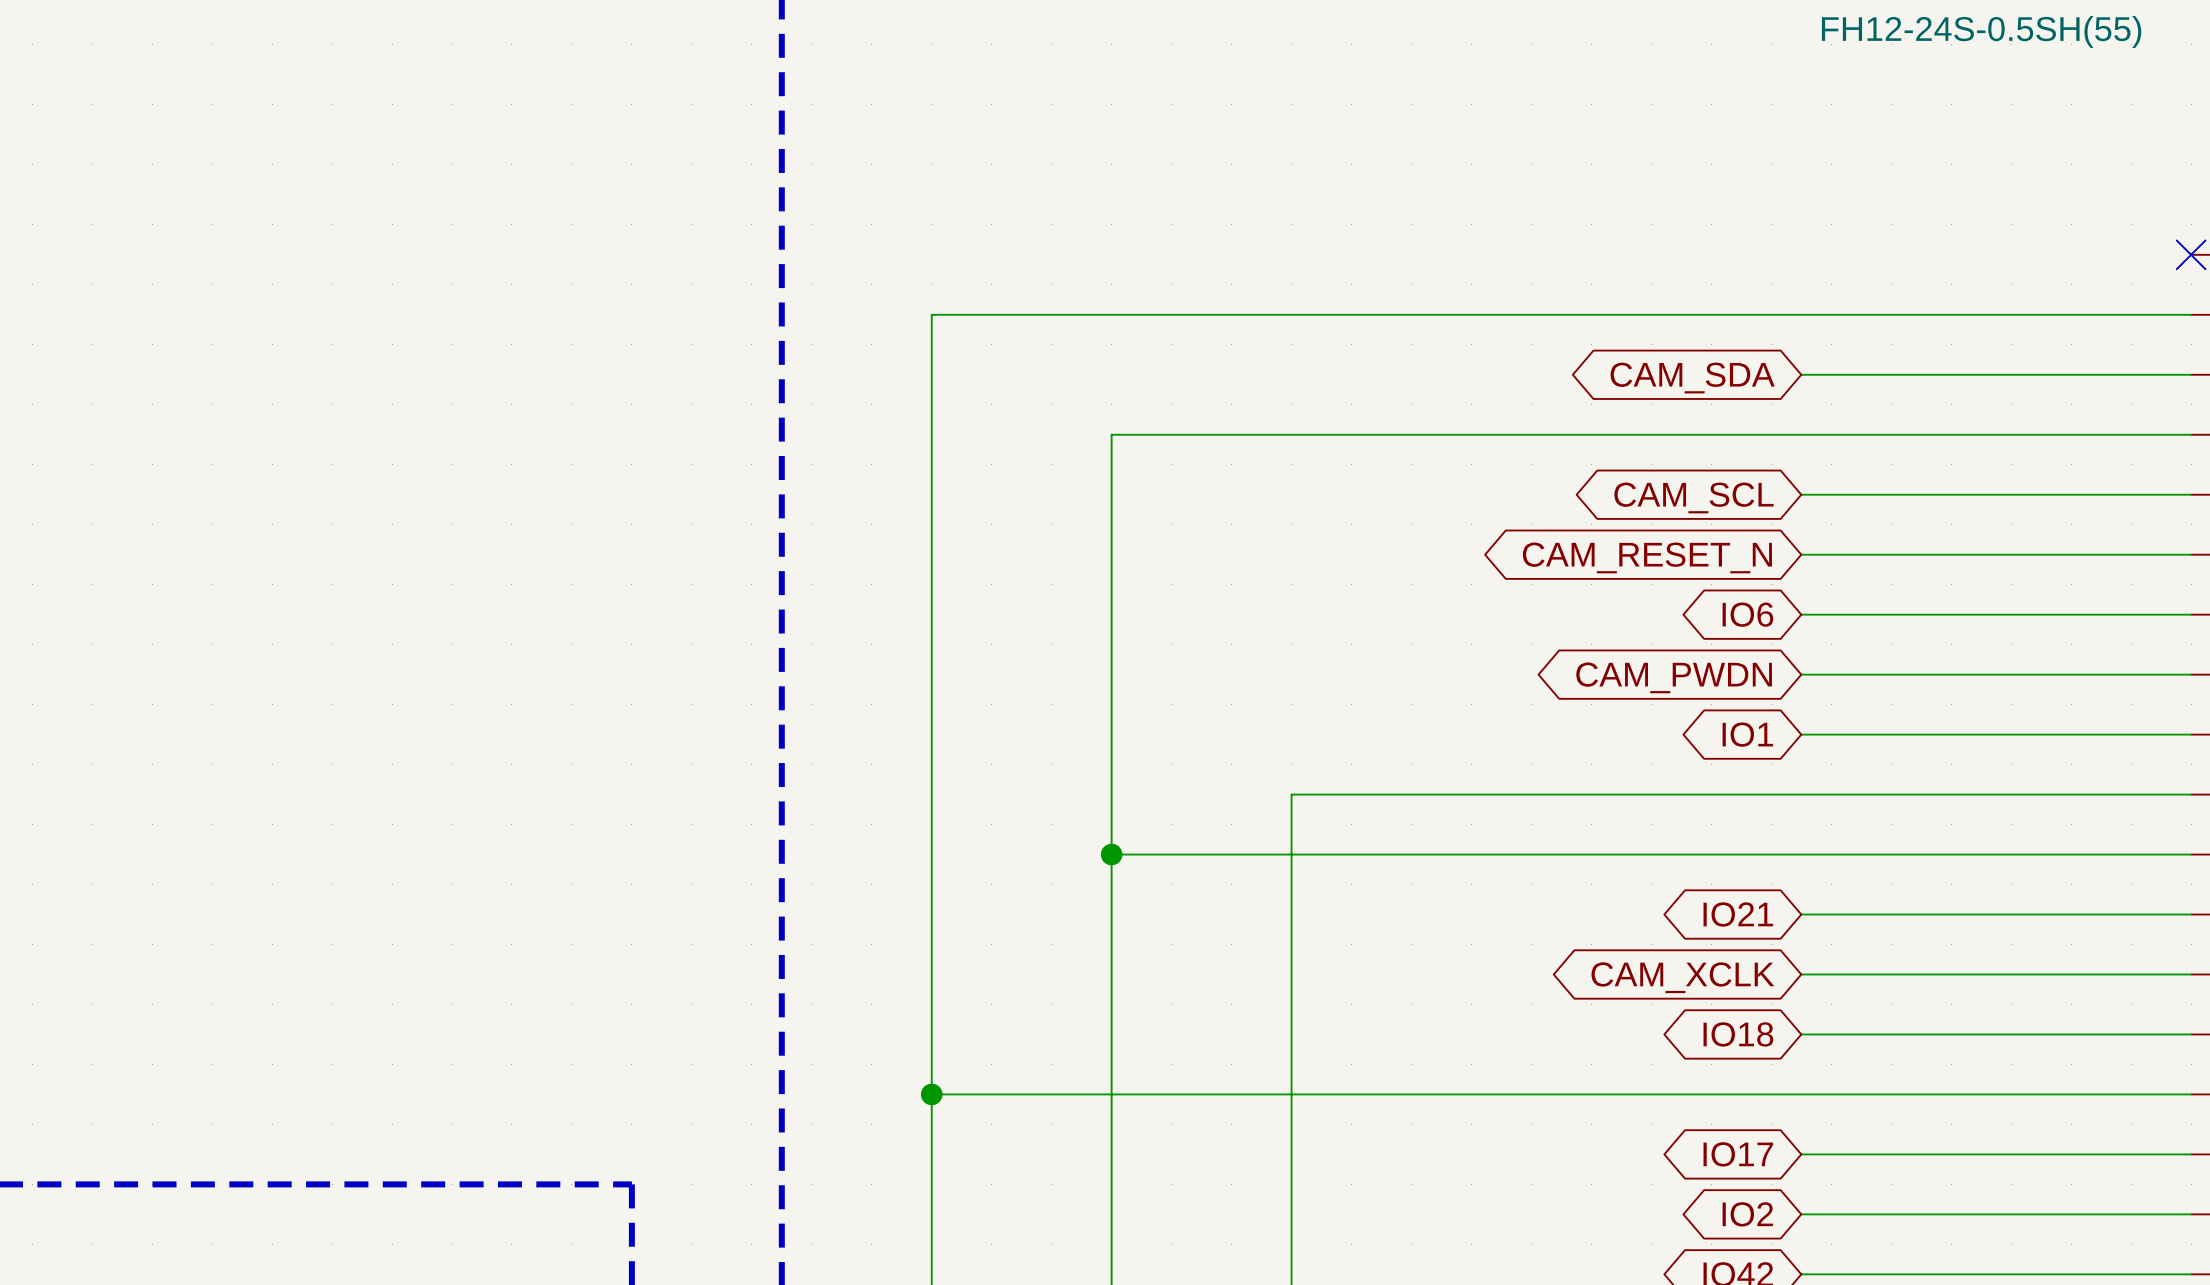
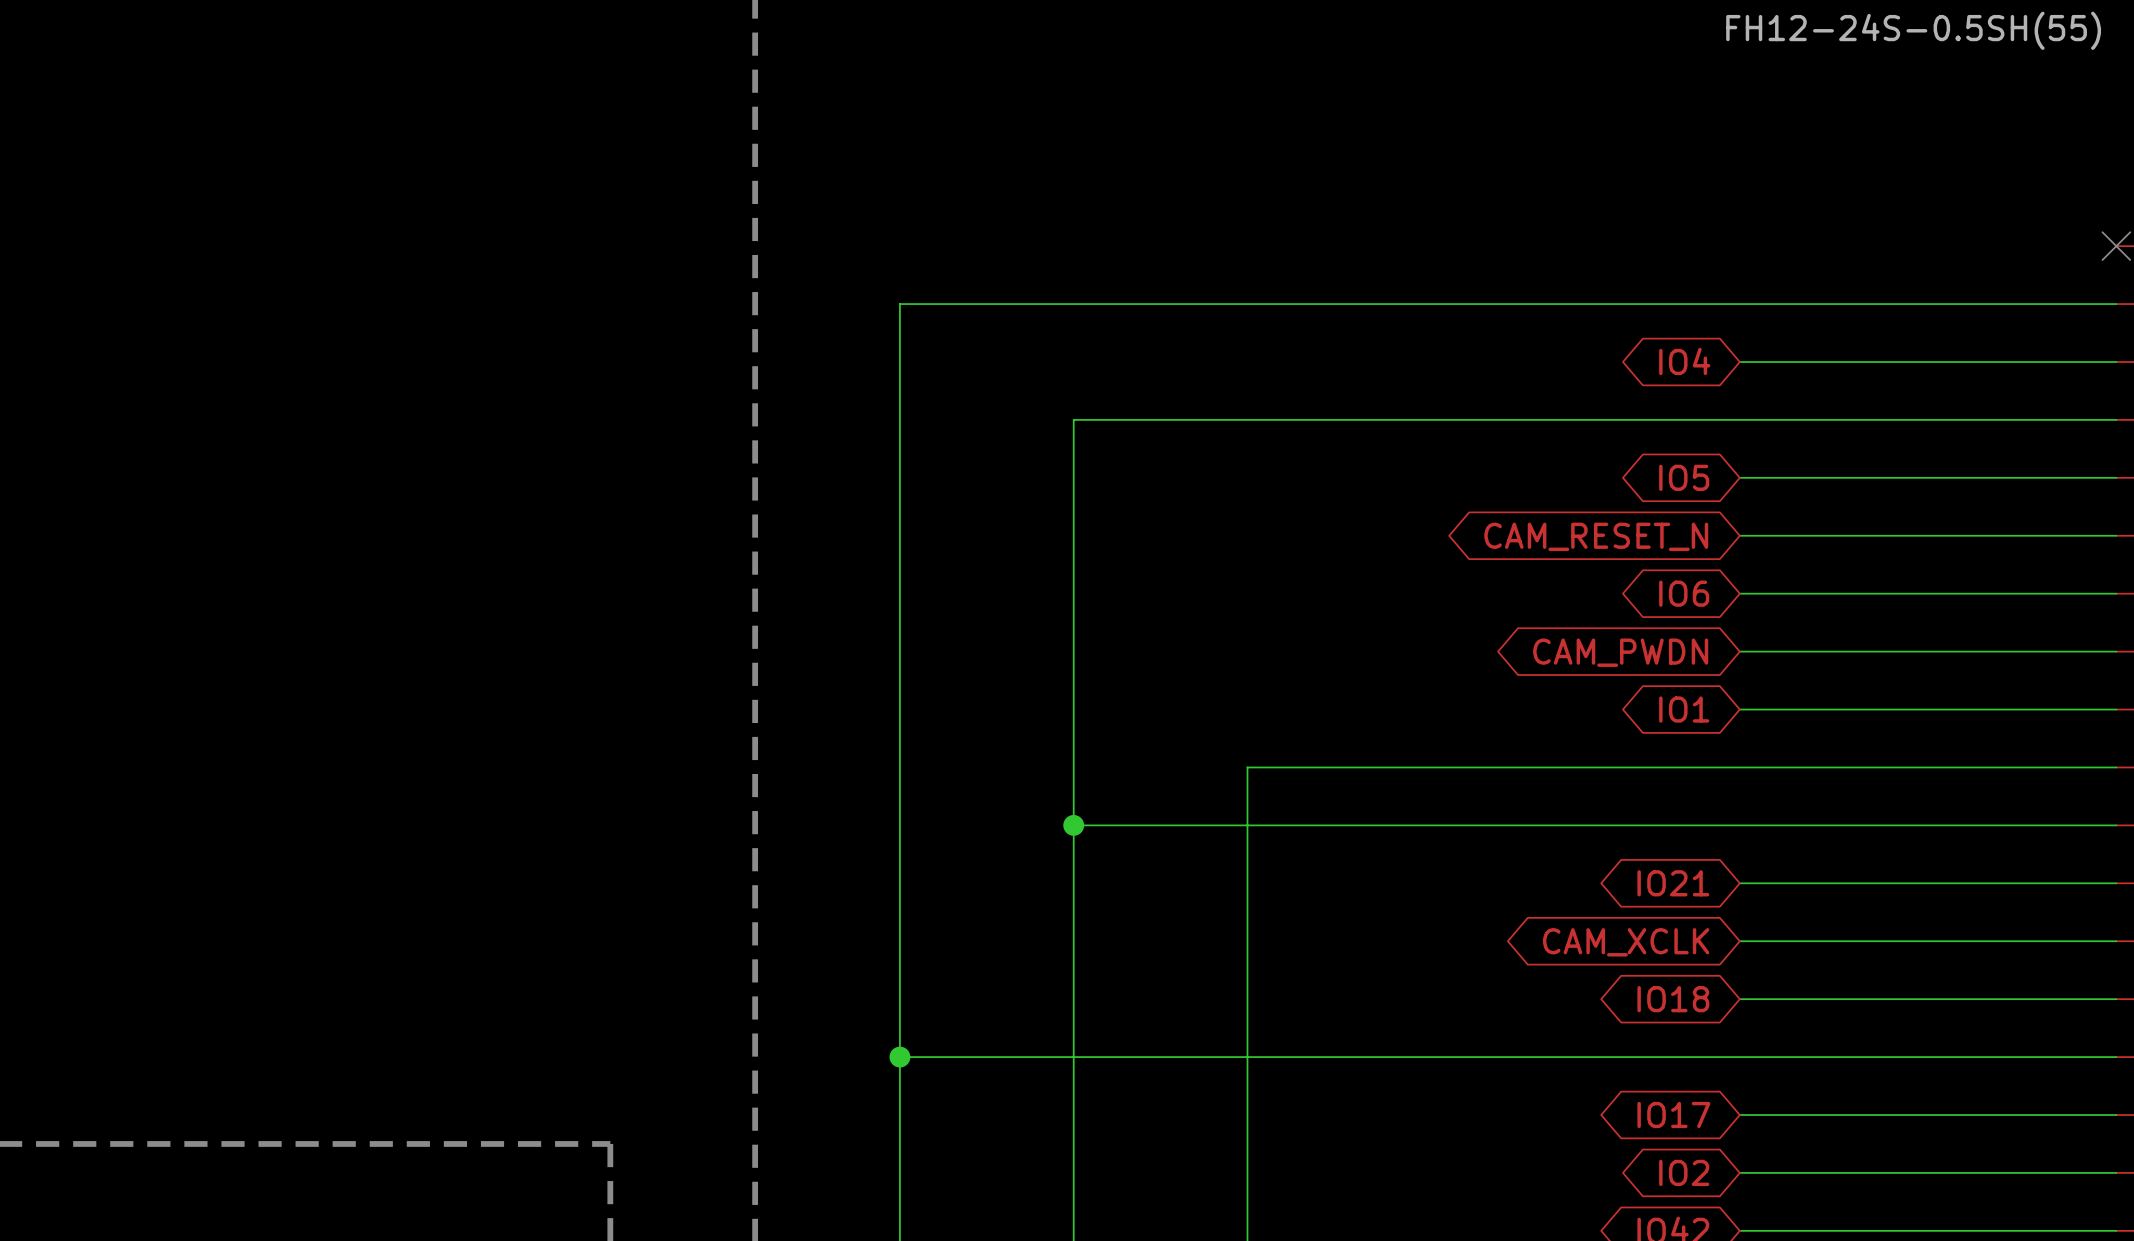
global label: CAM_SDA (1692, 378) -> IO4 (1684, 361)
global label: CAM_SCL (1694, 497) -> IO5 (1684, 477)

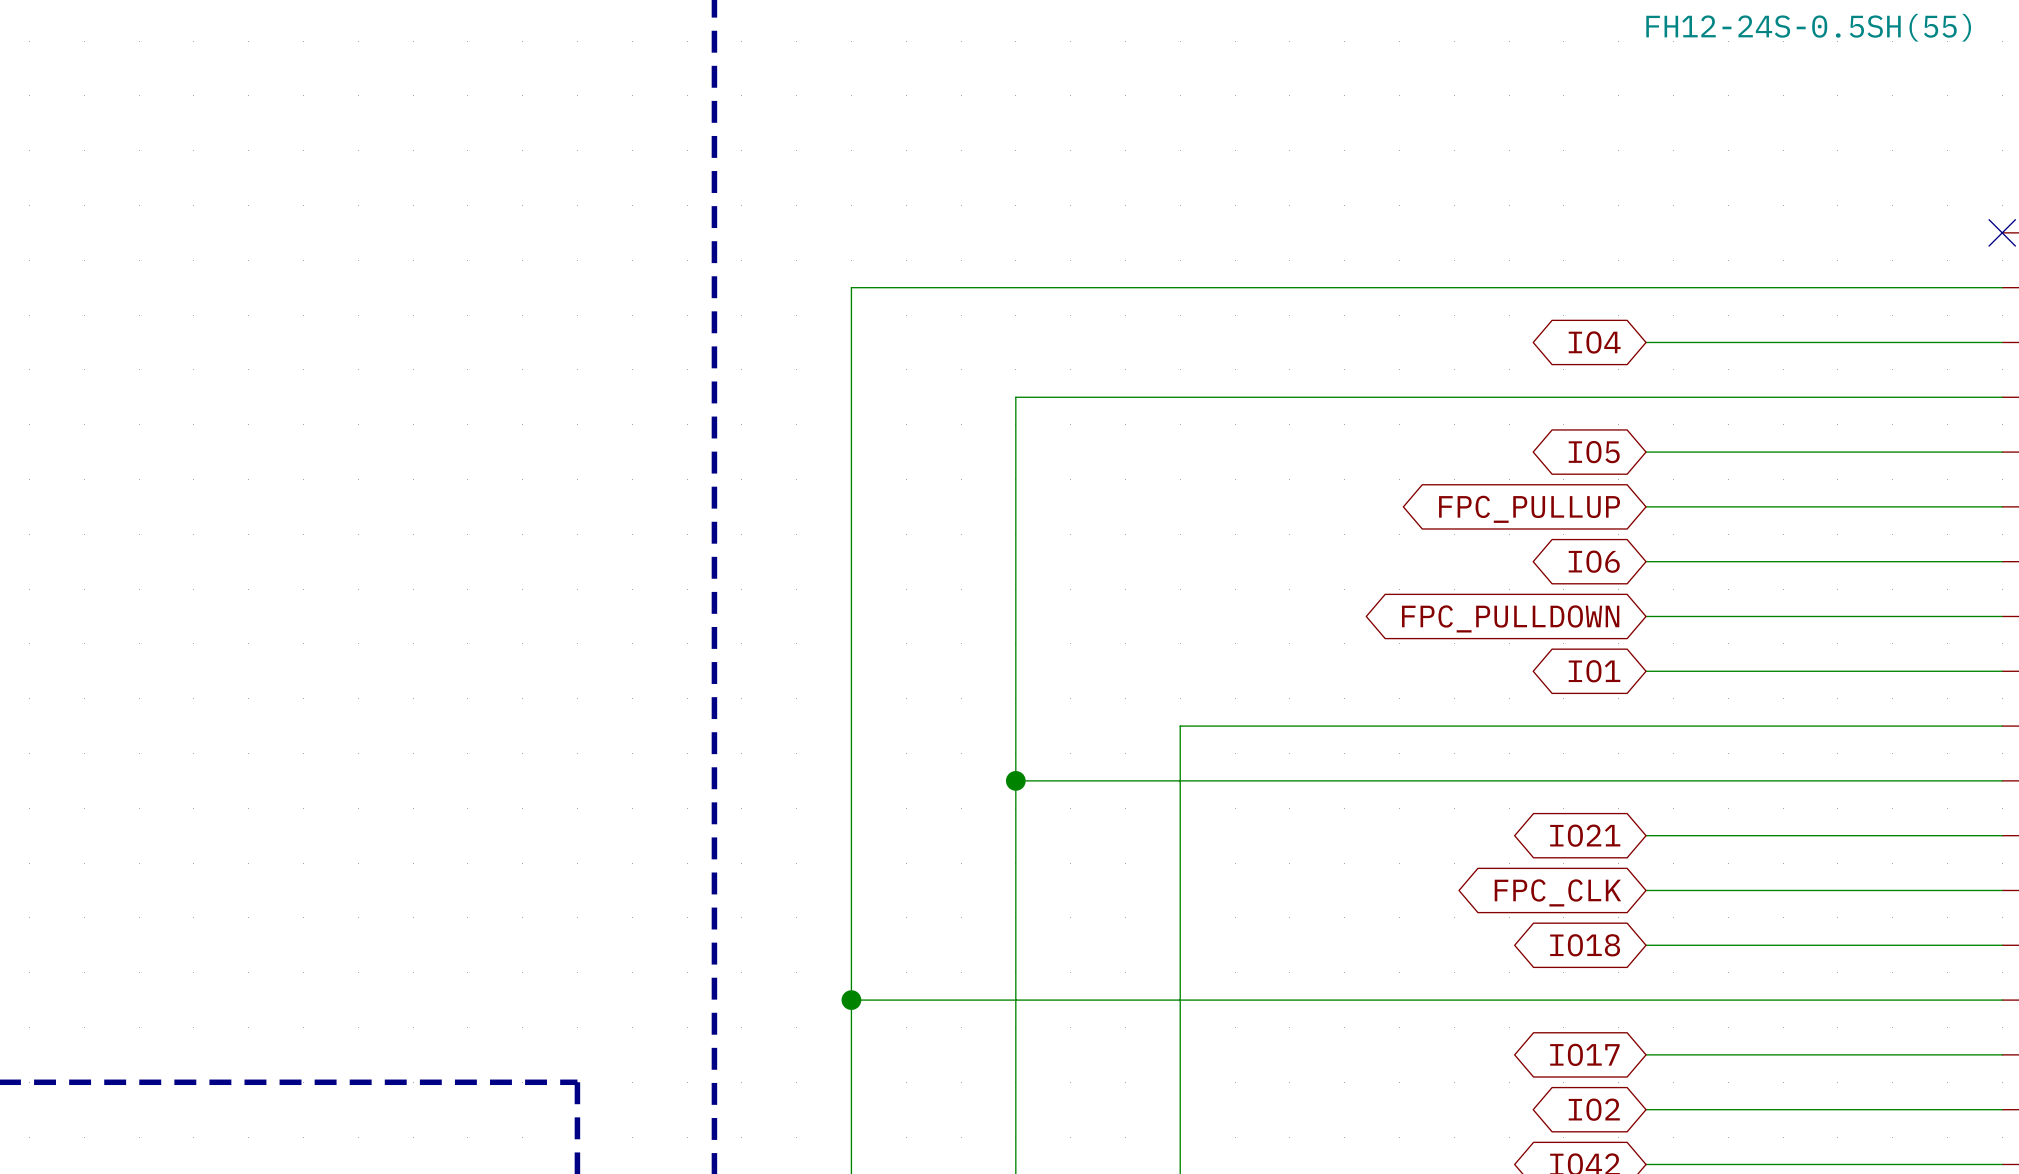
global label: CAM_RESET_N (1596, 536) -> FPC_PULLUP (1529, 509)
global label: CAM_PWDN (1620, 652) -> FPC_PULLDOWN (1510, 618)
global label: CAM_XCLK (1626, 942) -> FPC_CLK (1557, 892)

